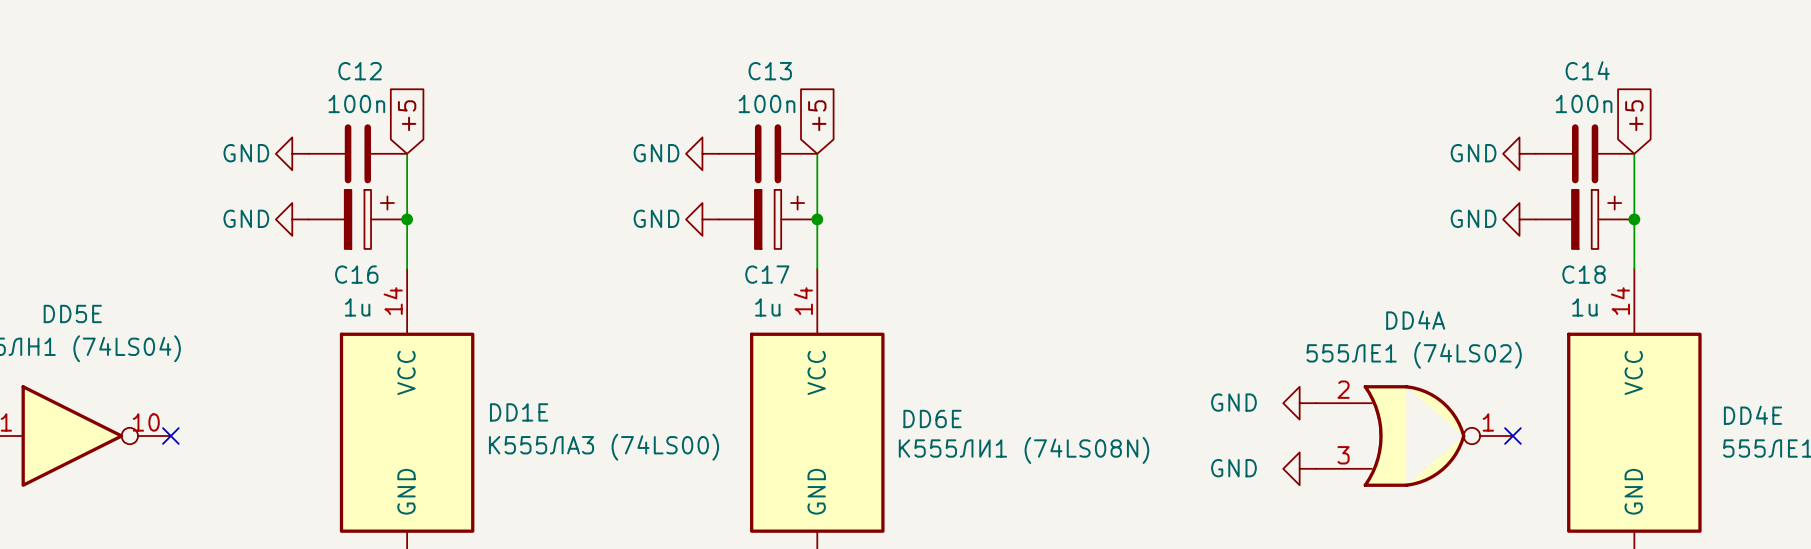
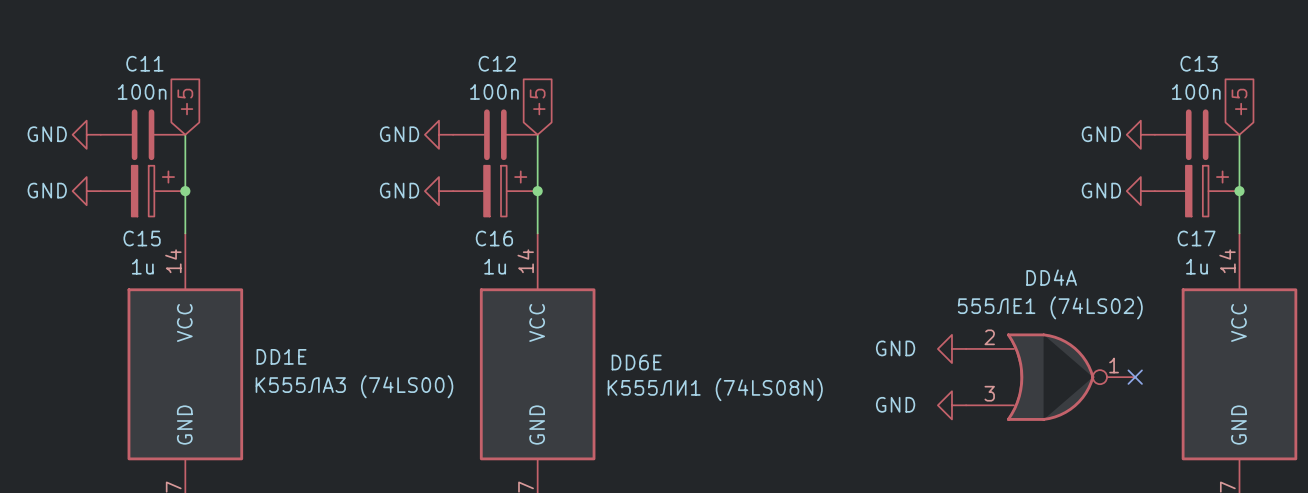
C14 name: C14 (1587, 70) -> C13 (1199, 63)
C12 name: C12 (360, 71) -> C11 (144, 63)
C13 name: C13 (770, 71) -> C12 (497, 63)
C16 name: C16 (356, 274) -> C15 (142, 238)
C17 name: C17 (767, 274) -> C16 (494, 238)
C18 name: C18 (1584, 274) -> C17 (1196, 238)

